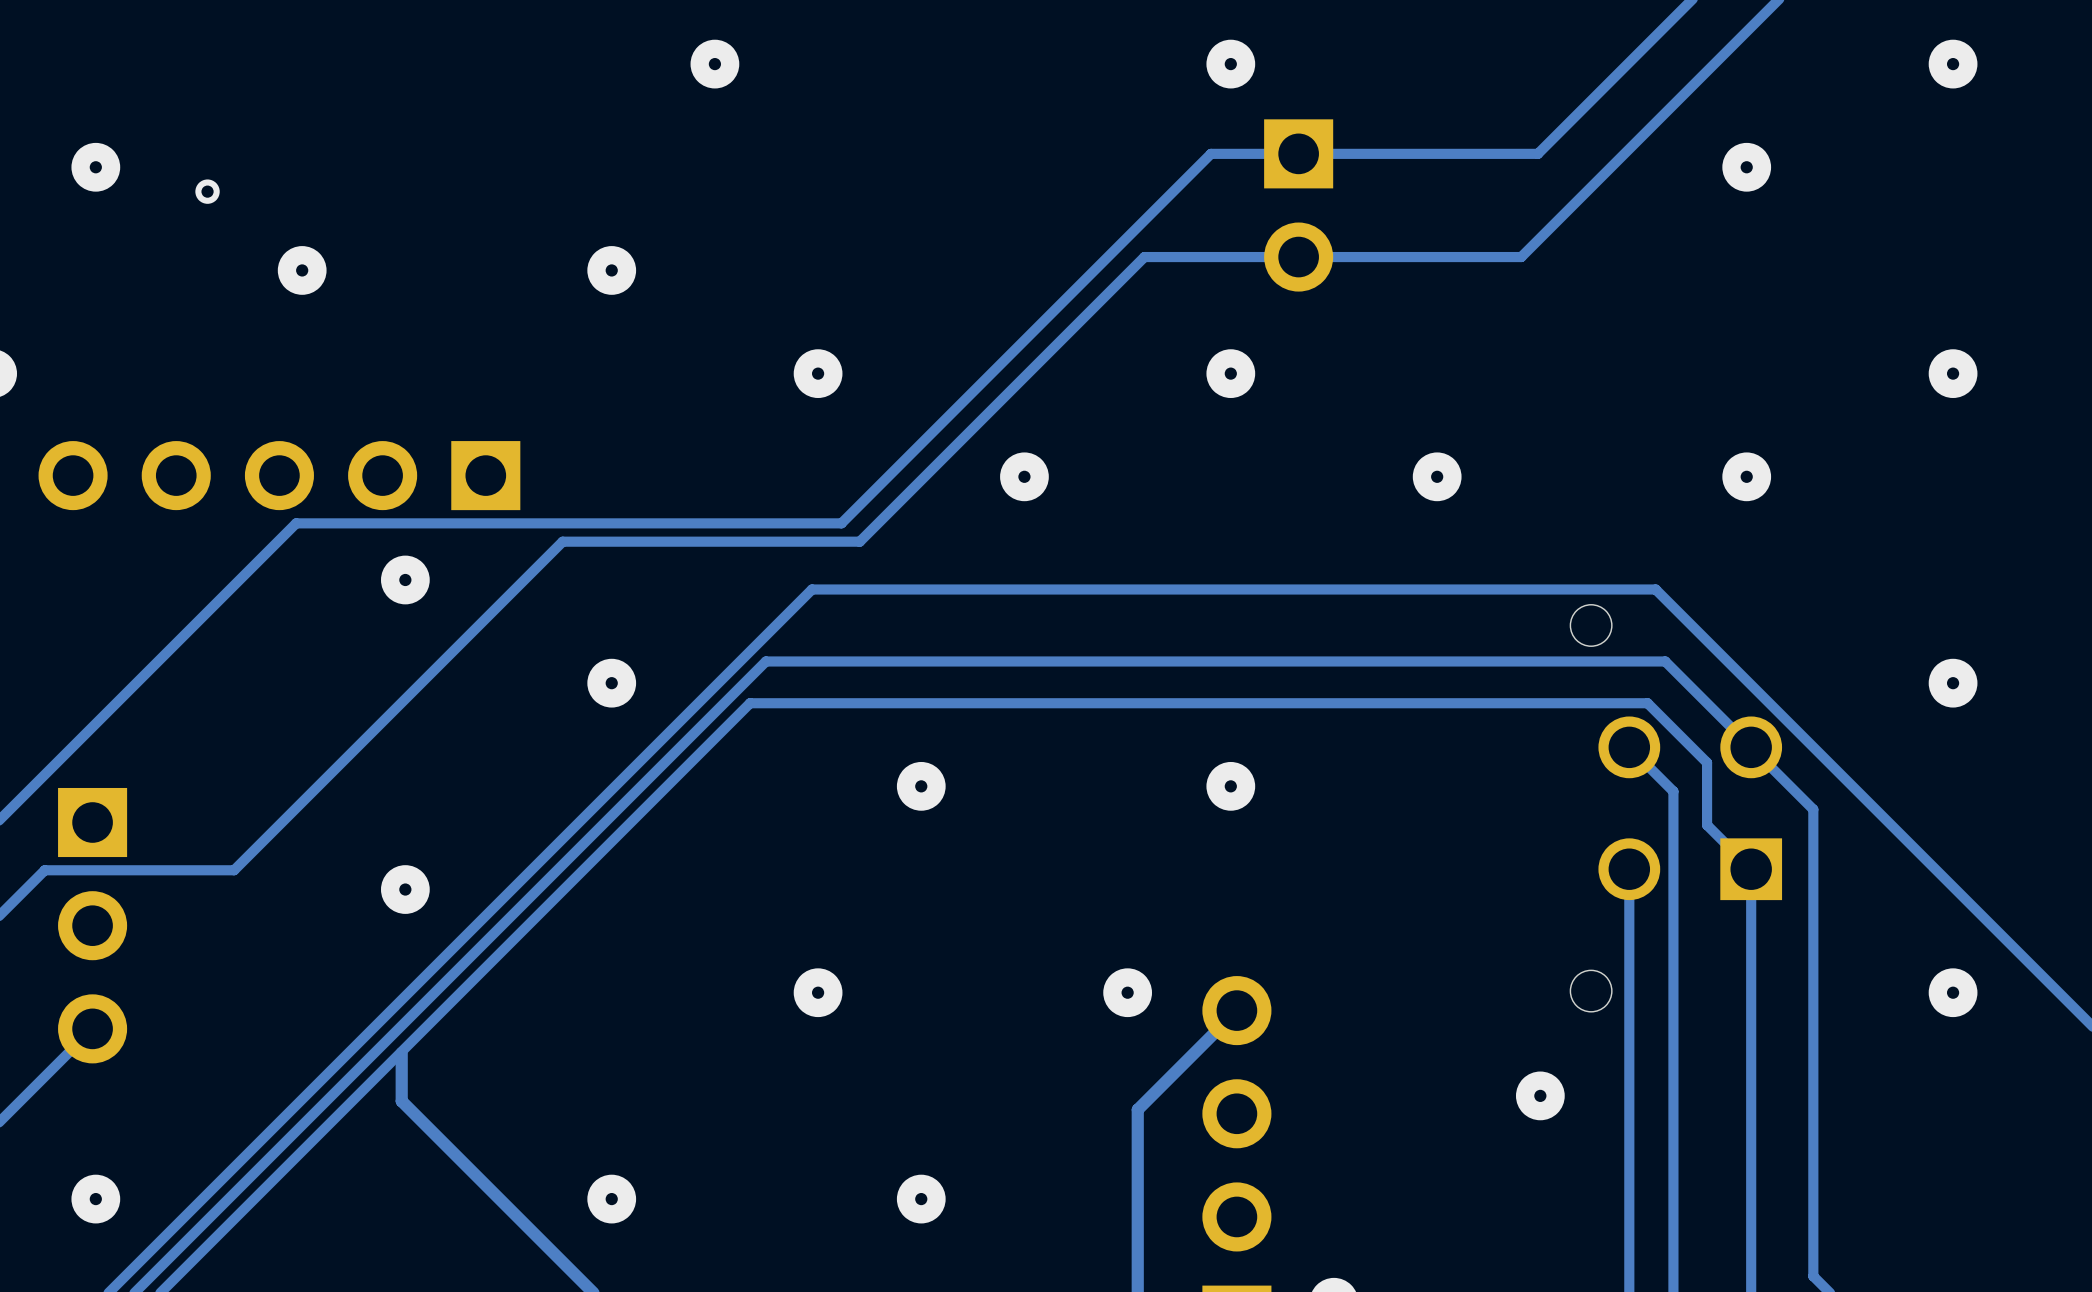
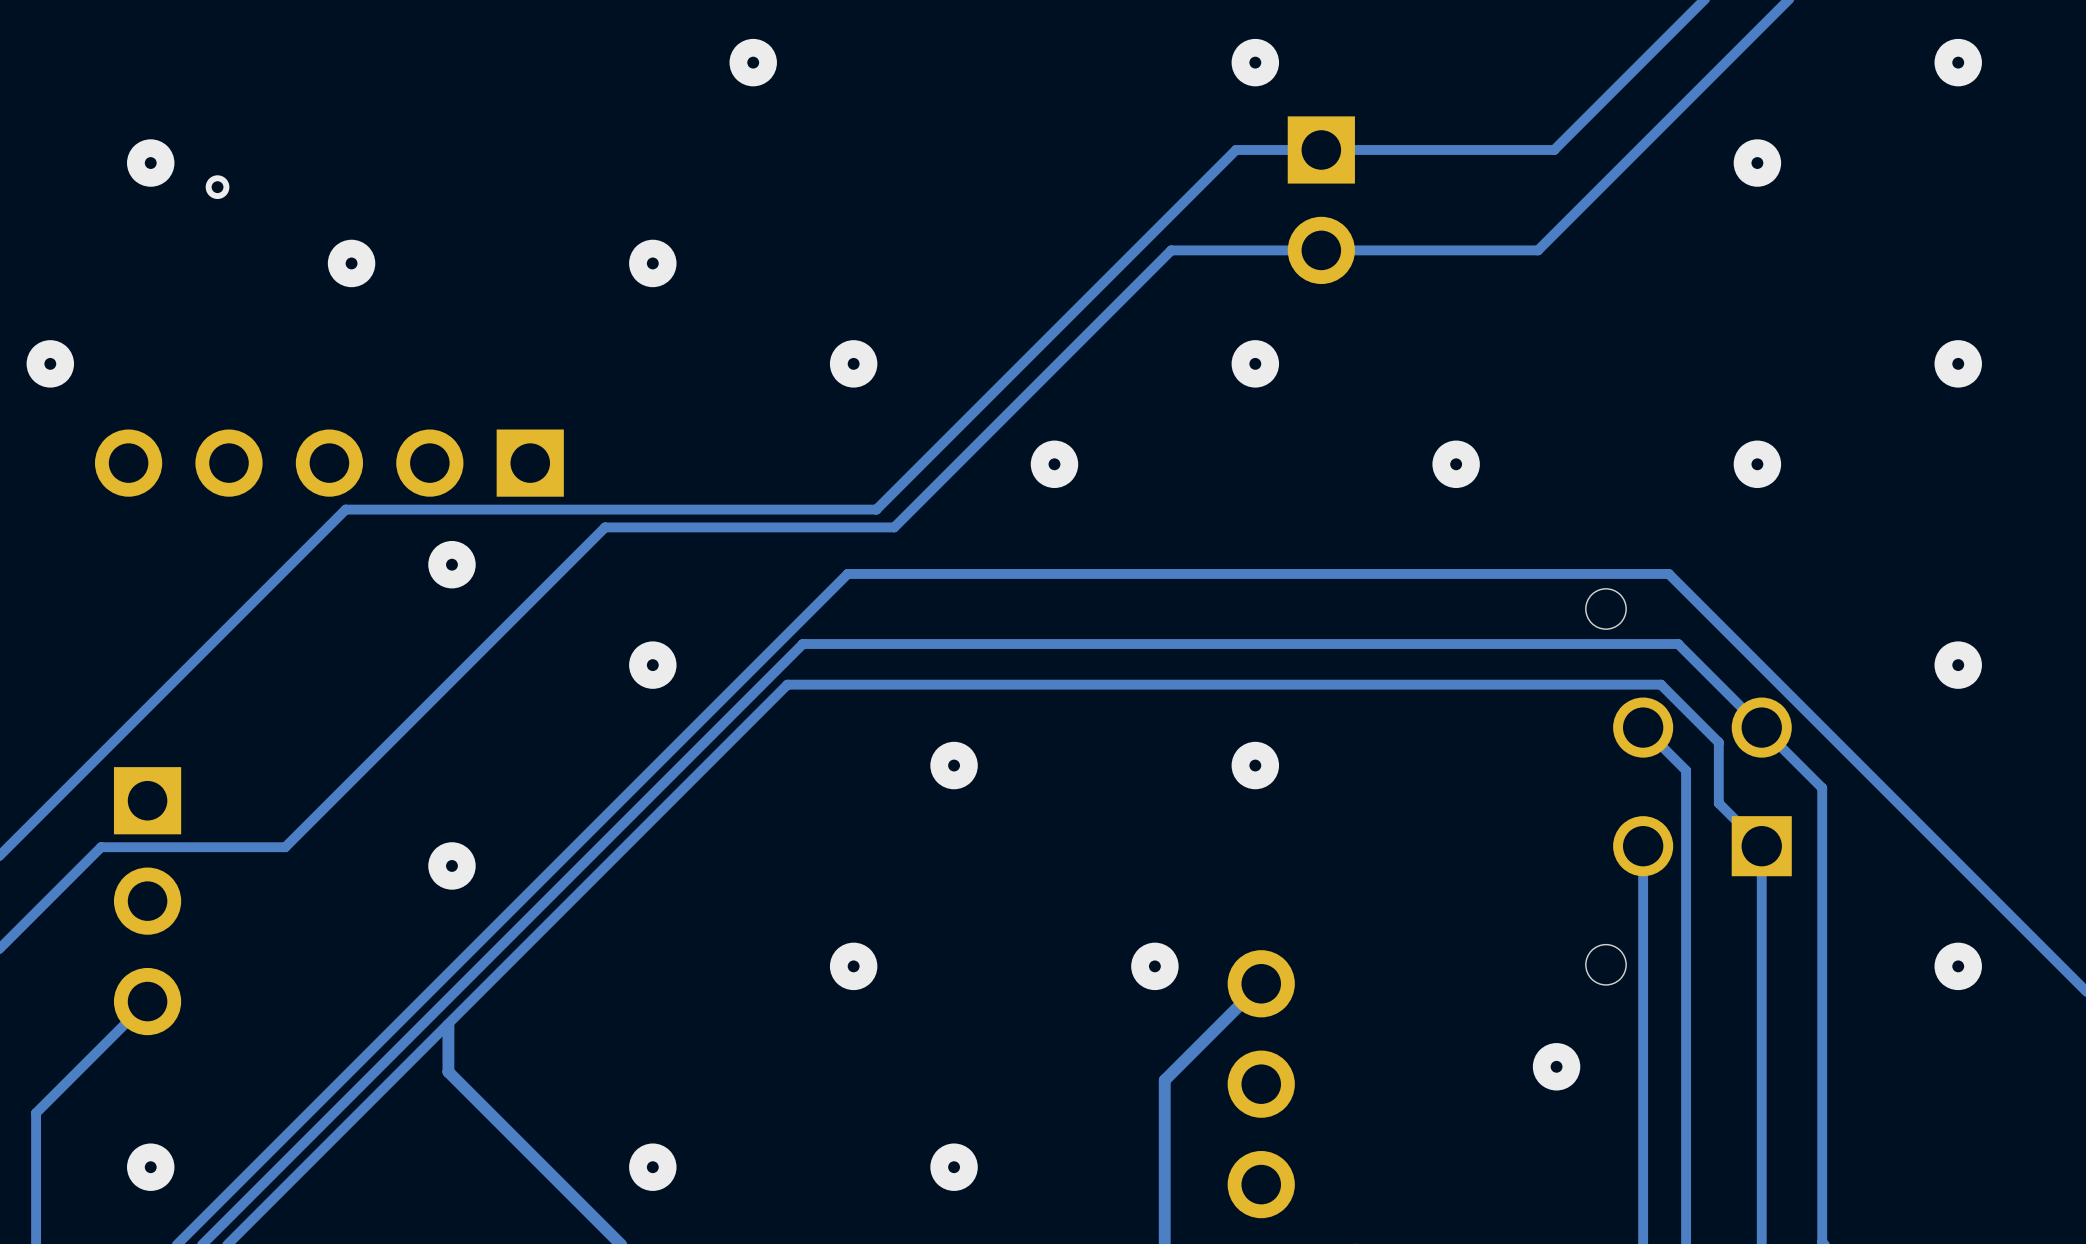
via position: (207, 191) -> (217, 187)

